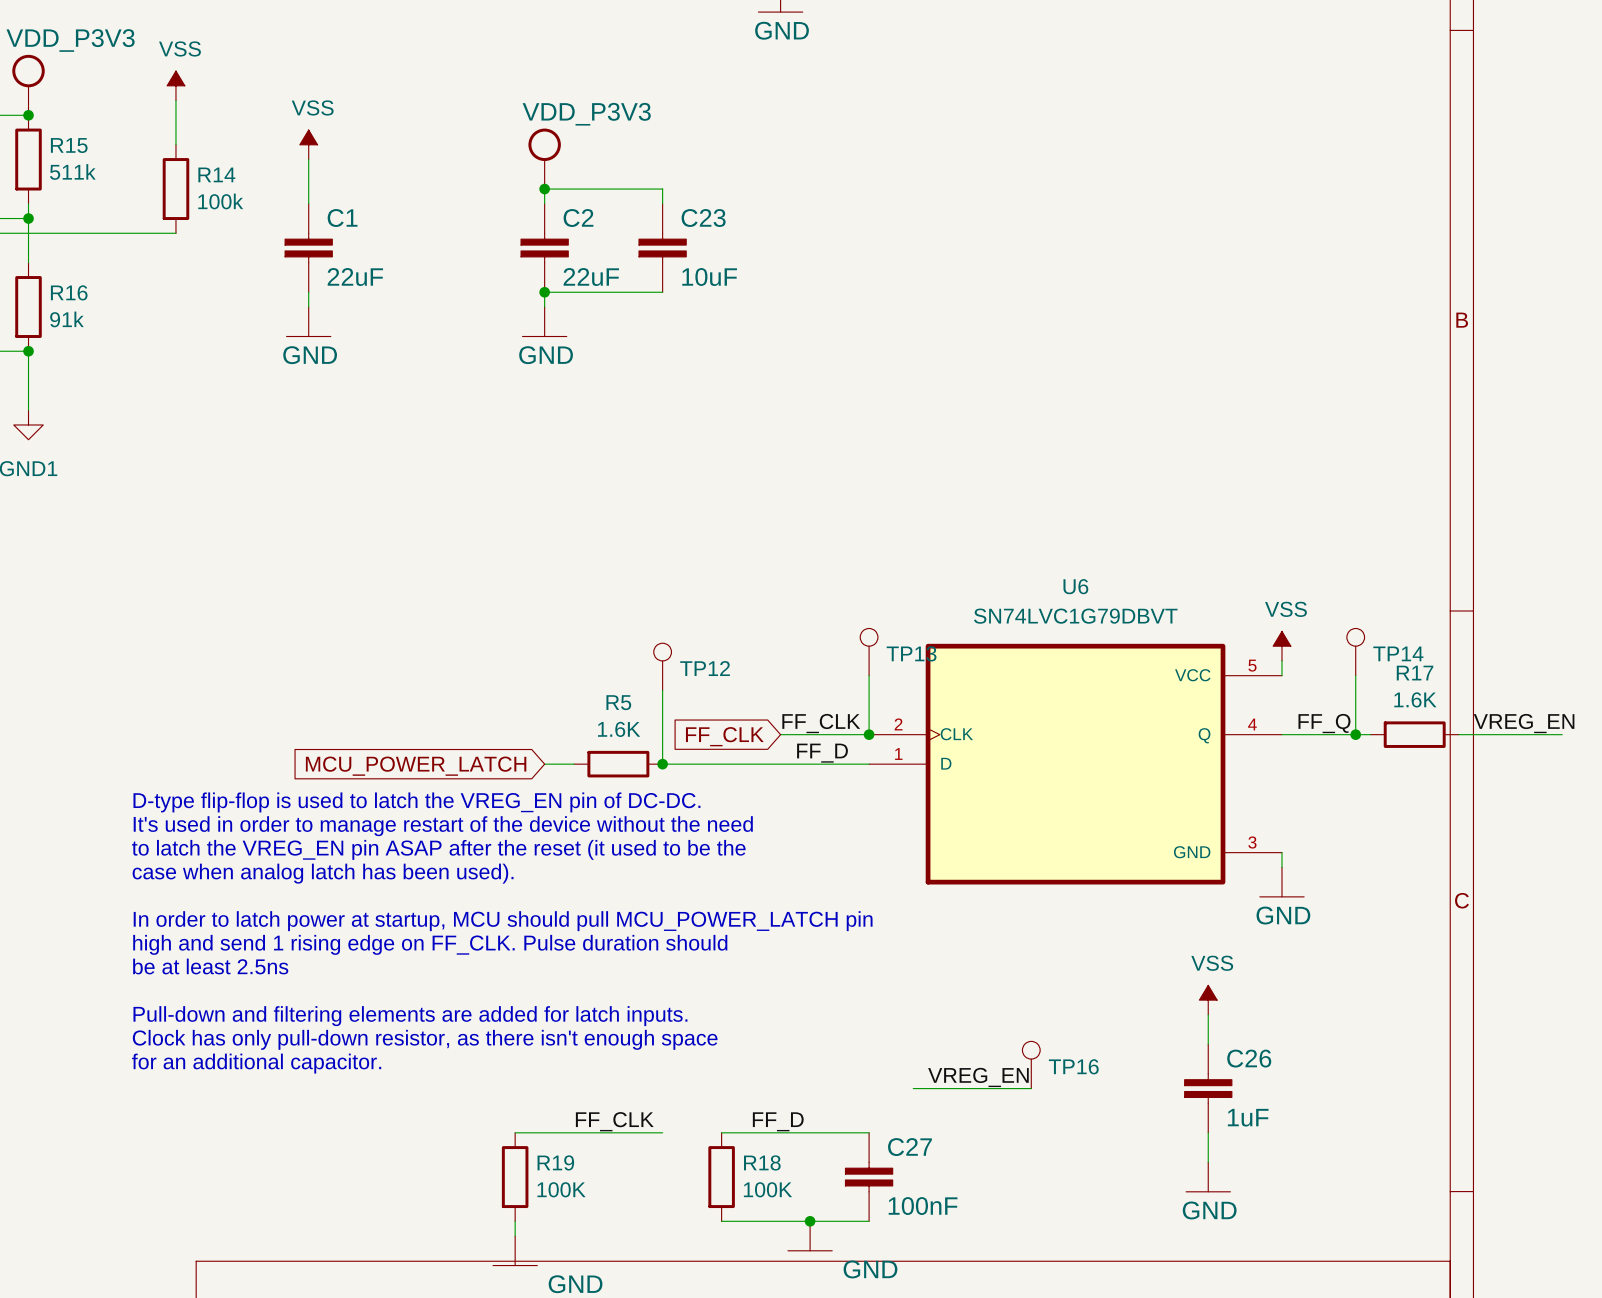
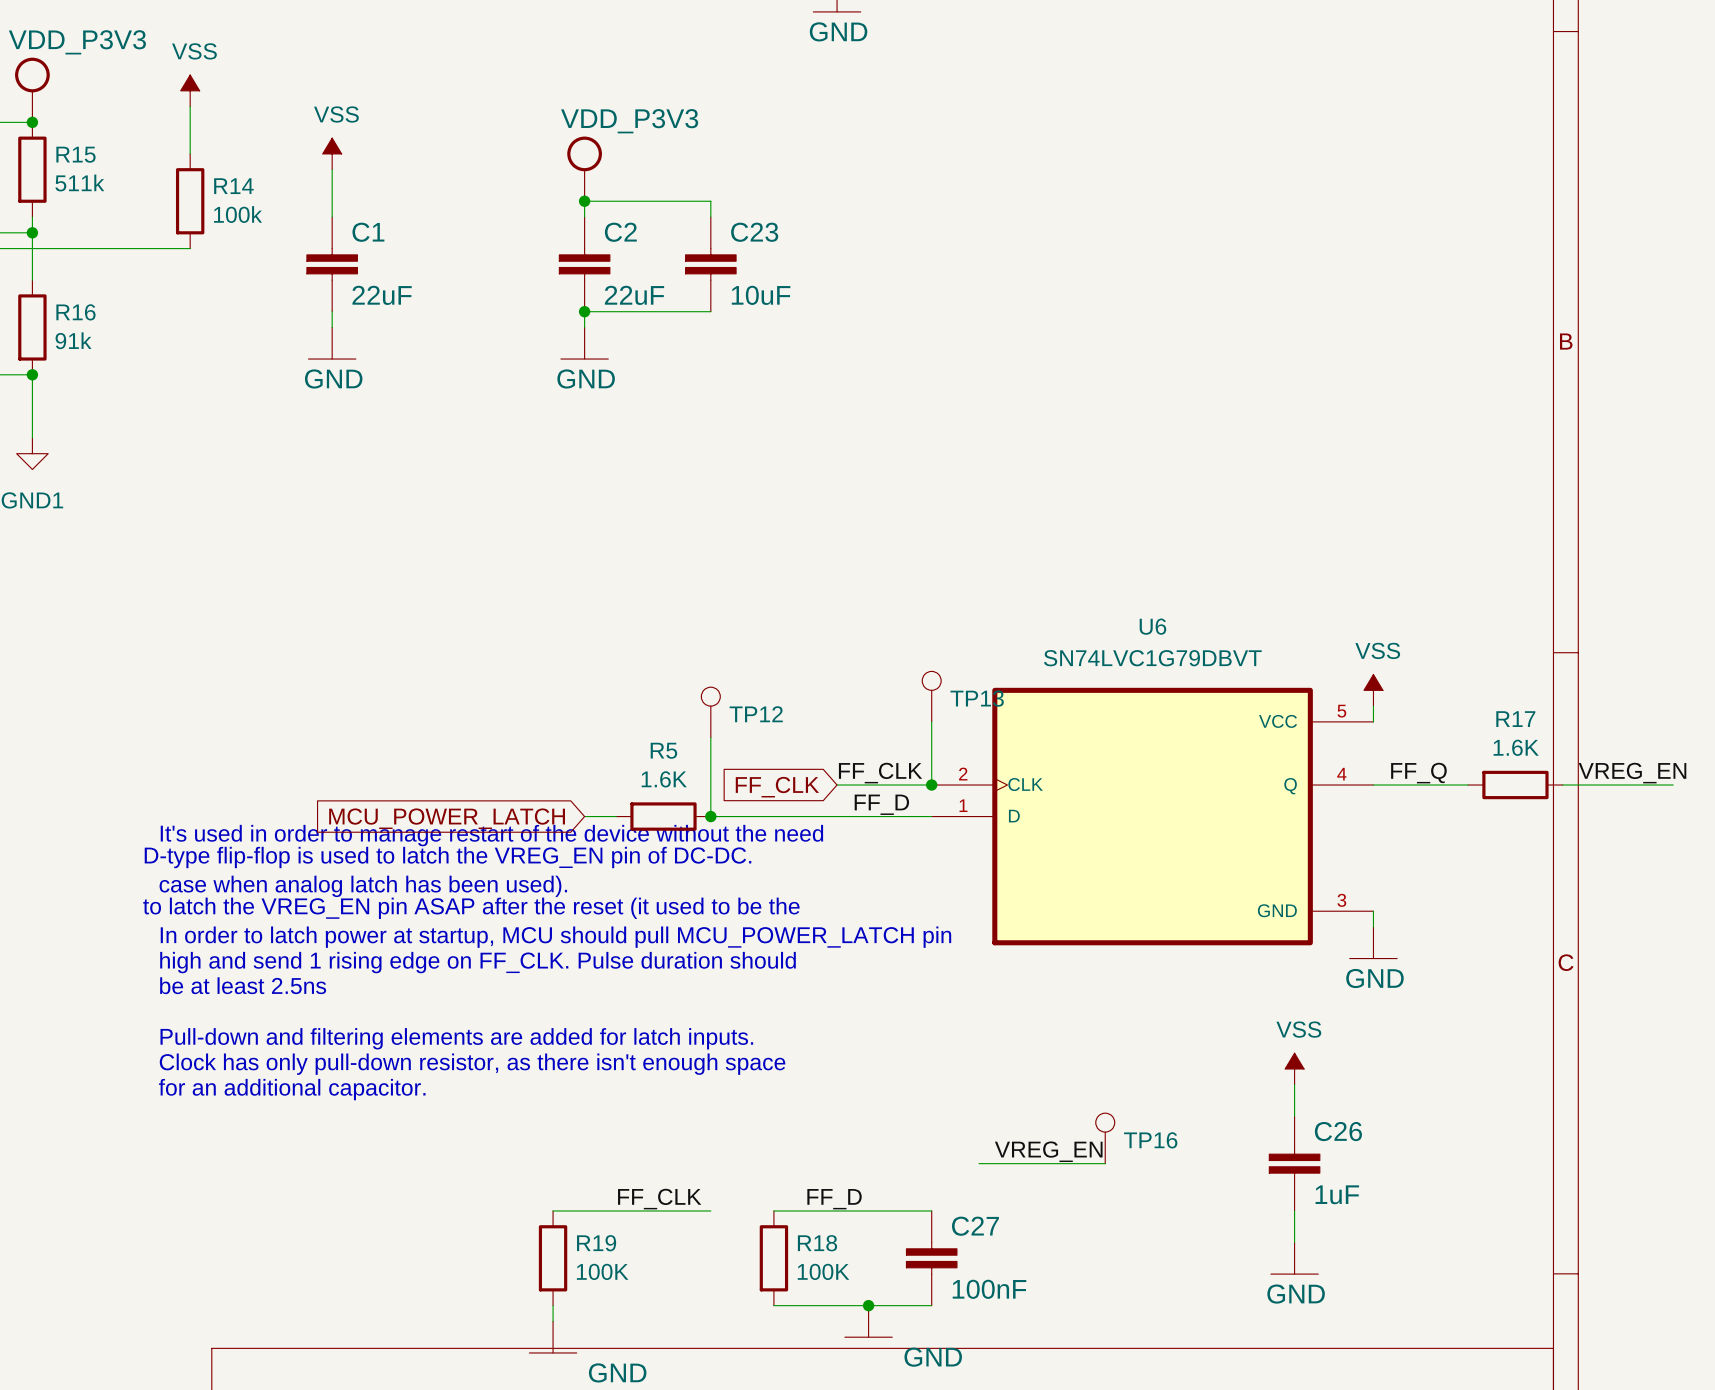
TP14: (1355, 652) -> none
wire: (1355, 675) (1355, 734) -> none
junction: (1355, 734) -> none
text position: It's used in order to manage restart of the device without the need (443, 826) -> It's used in order to manage restart of the device without the need (491, 835)
text position: case when analog latch has been used). (323, 873) -> case when analog latch has been used). (363, 886)
text position: In order to latch power at startup, MCU should pull MCU_POWER_LATCH pin (503, 921) -> In order to latch power at startup, MCU should pull MCU_POWER_LATCH pin (555, 937)
text position: high and send 1 rising edge on FF_CLK. Pulse duration should (430, 944) -> high and send 1 rising edge on FF_CLK. Pulse duration should (478, 962)
text position: be at least 2.5ns (210, 966) -> be at least 2.5ns (243, 985)
text position: Pull-down and filtering elements are added for latch inputs. (410, 1016) -> Pull-down and filtering elements are added for latch inputs. (456, 1038)
text position: Clock has only pull-down resistor, as there isn't enough space (425, 1039) -> Clock has only pull-down resistor, as there isn't enough space (472, 1064)
text position: for an additional capacitor. (256, 1063) -> for an additional capacitor. (292, 1089)

